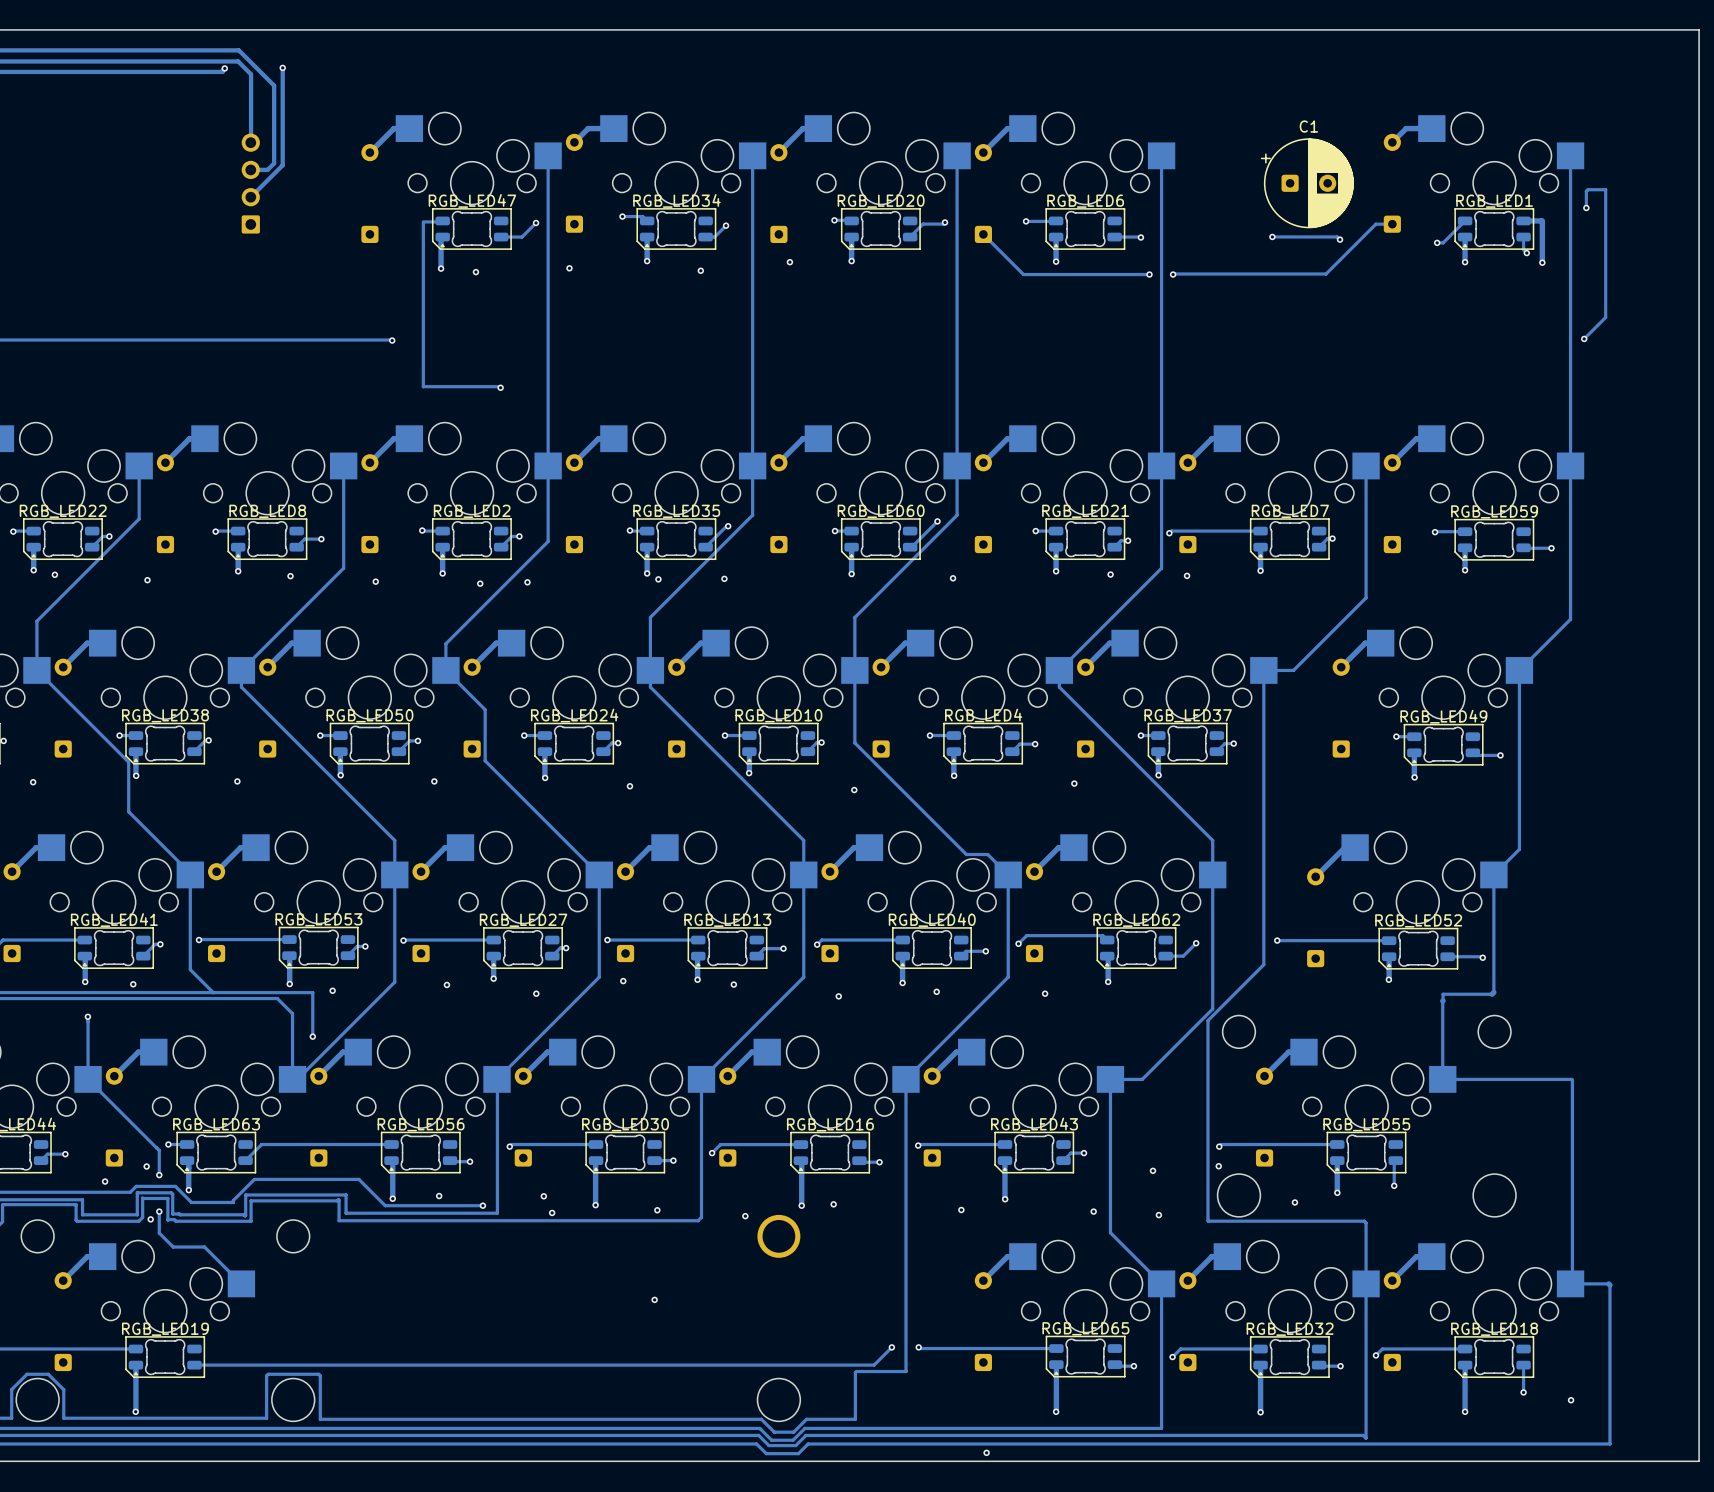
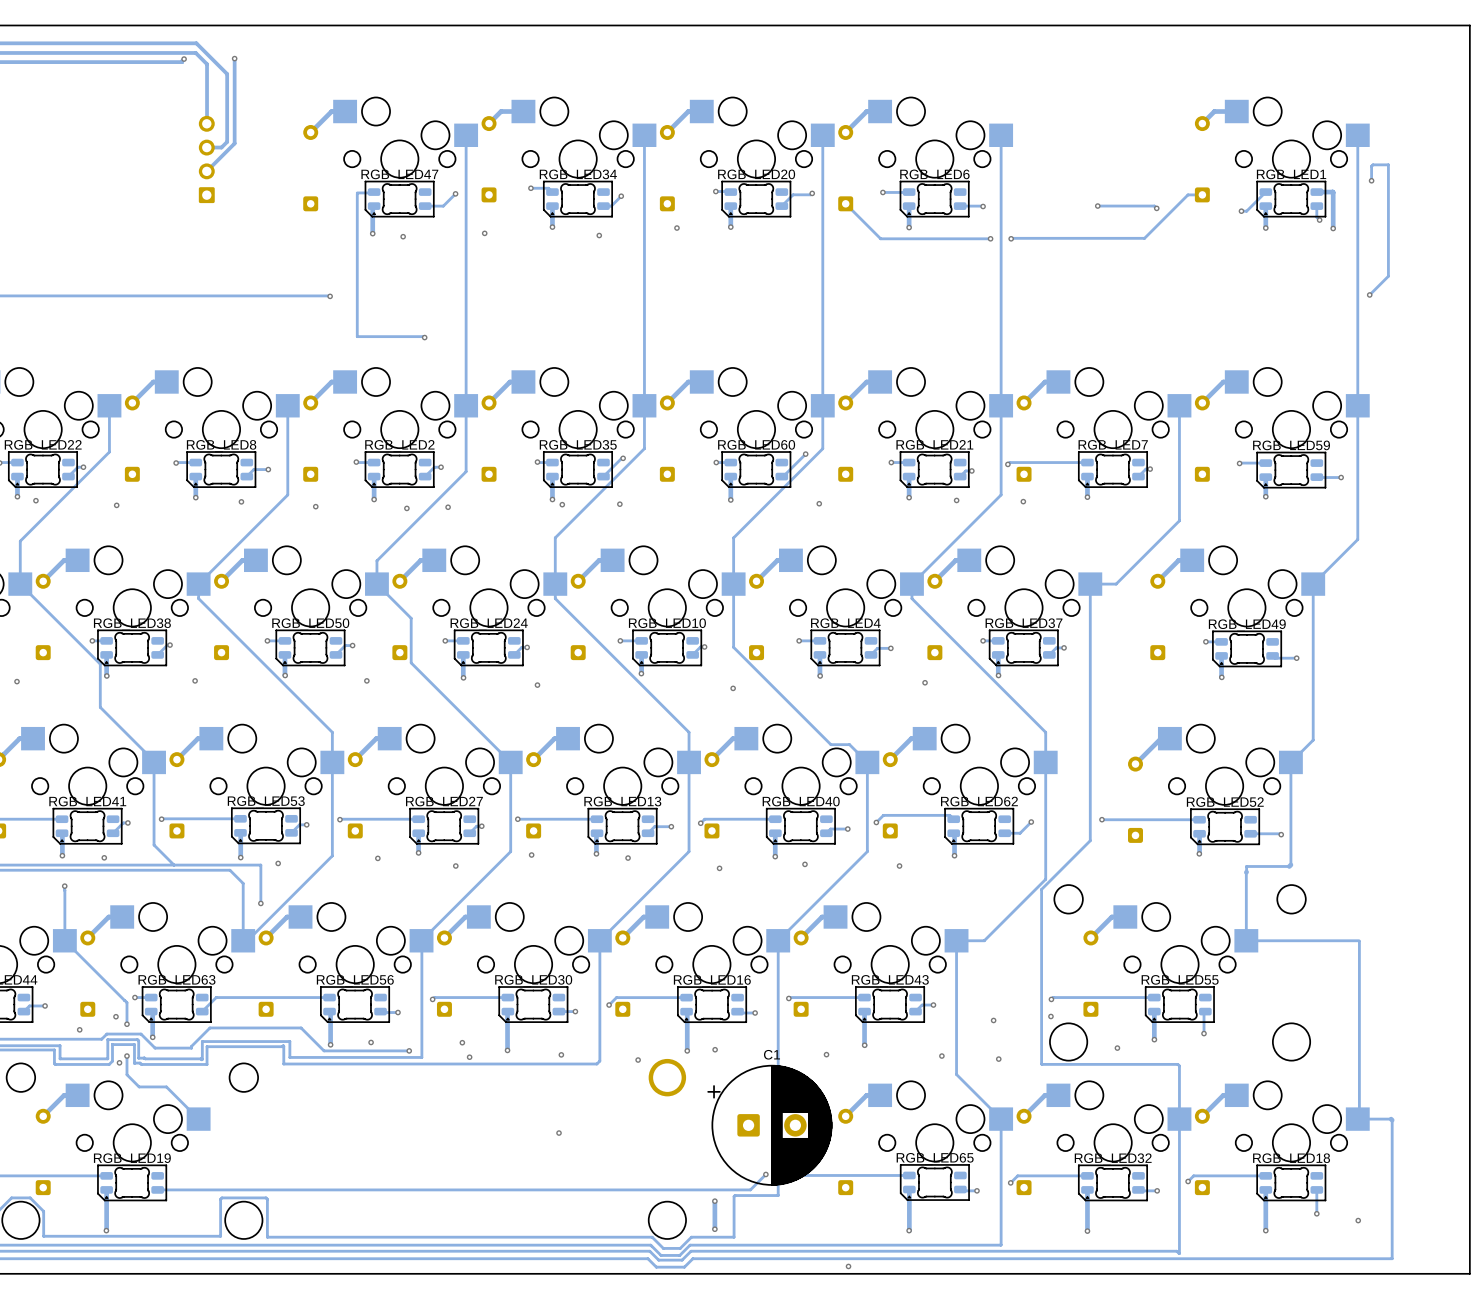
C1 name position: C1 (1308, 126) -> C1 (772, 1054)
C1 footprint: [1260, 138, 1354, 229] -> [707, 1065, 833, 1186]
track: none -> (714, 1201) (714, 1229)
via: none -> (714, 1201)
via: none -> (714, 1229)

